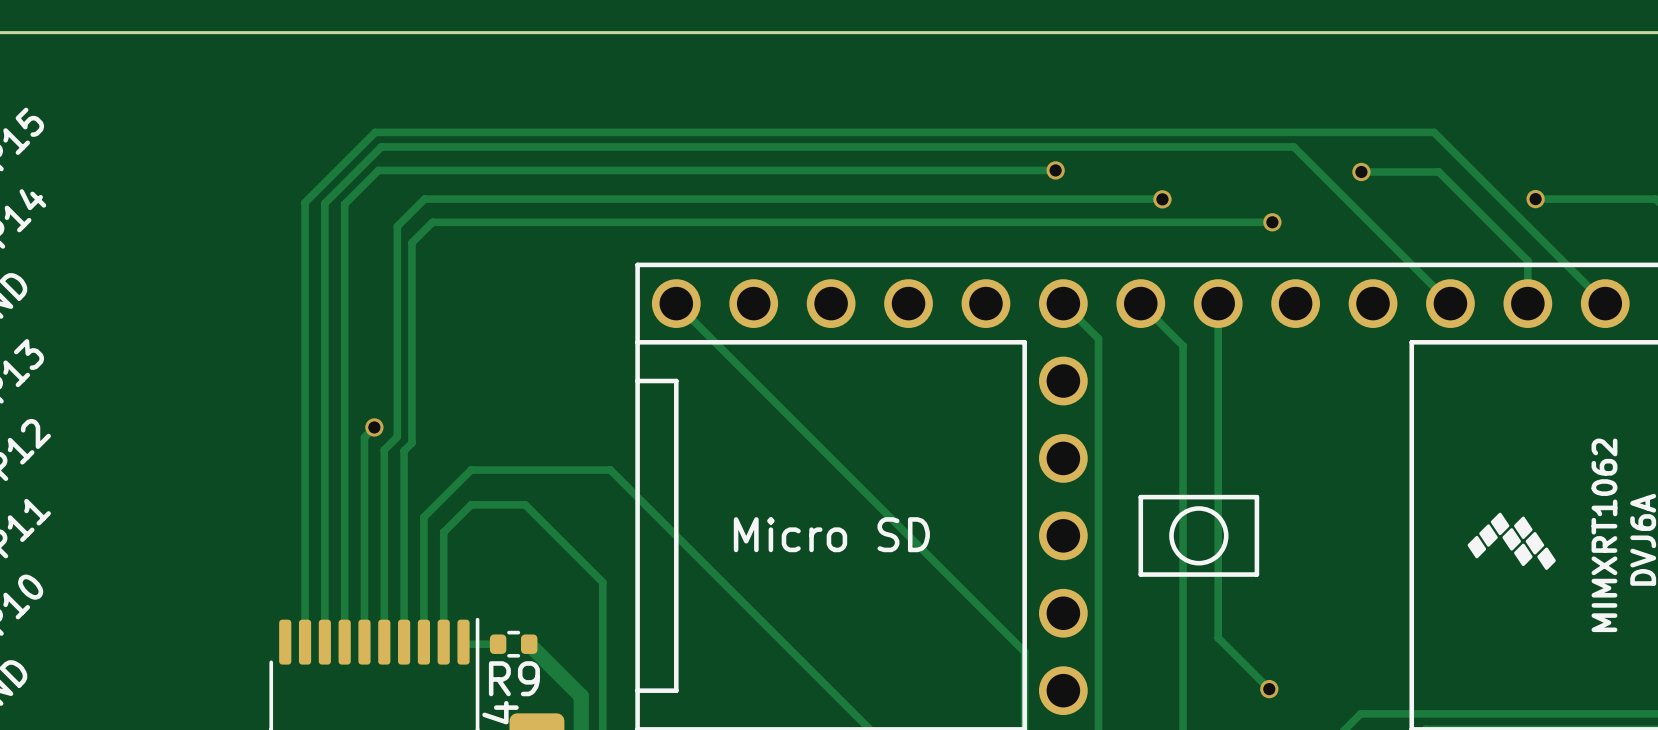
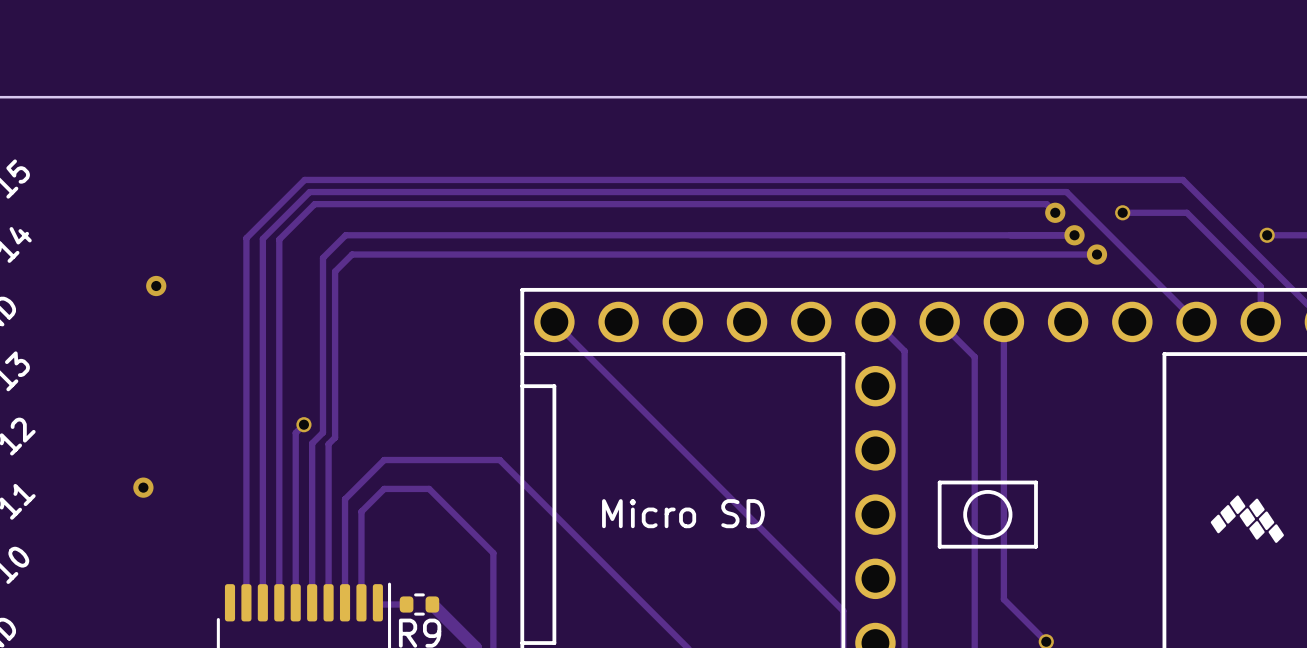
track: (378, 170) (1055, 170) -> (307, 211) (314, 204) (1046, 204) (1055, 212)
via: (1055, 170) -> none
via: none -> (1055, 212)
track: none -> (957, 235) (1074, 235)
via: (1162, 199) -> none
via: none -> (1074, 235)
track: none -> (1048, 254) (1097, 254)
via: (1272, 222) -> none
via: none -> (1097, 254)
via: none -> (156, 286)
via: none -> (143, 487)

